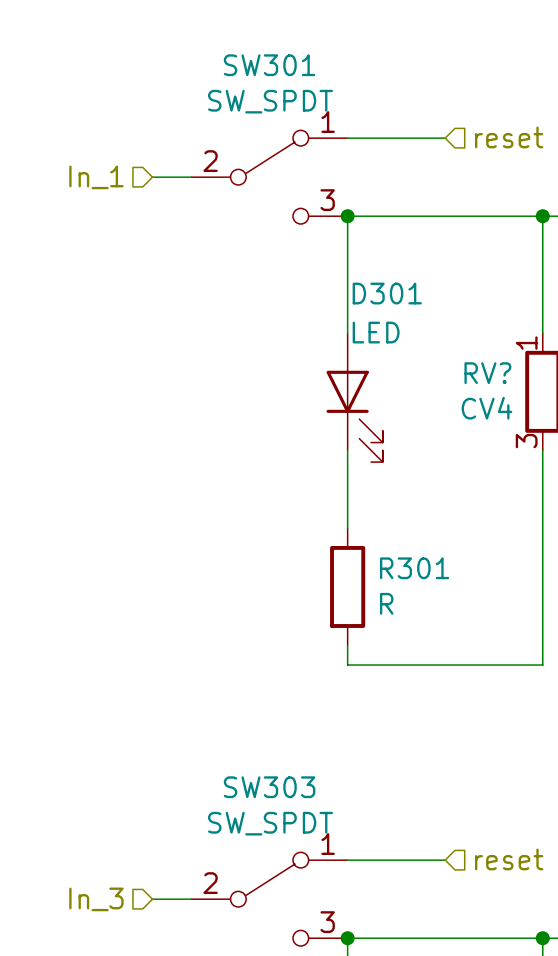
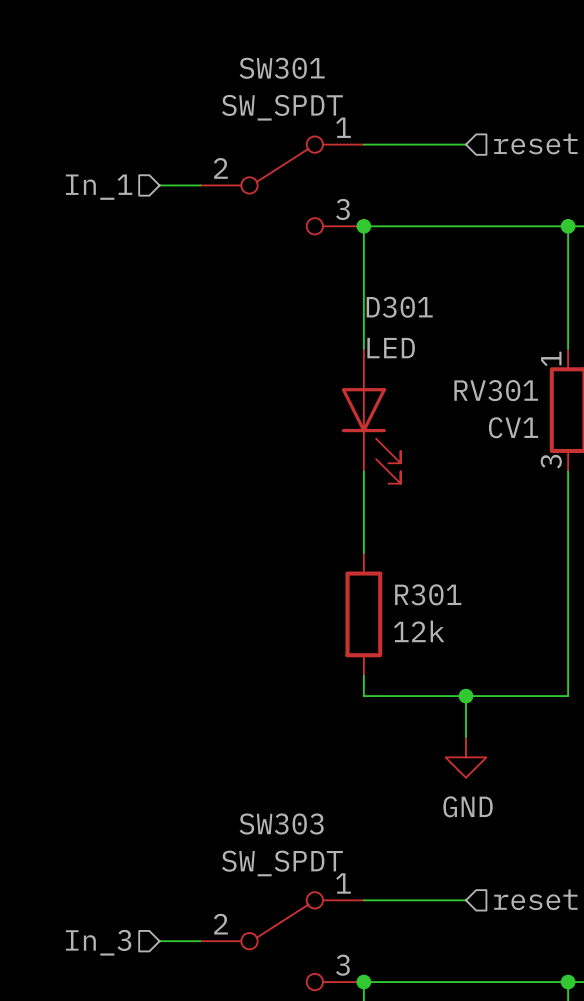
RV? name: RV? (487, 373) -> RV301 (496, 390)
RV? value: CV4 (486, 408) -> CV1 (513, 427)
R301 value: R (386, 603) -> 12k (419, 631)
wire: none -> (465, 696) (465, 736)
junction: none -> (465, 696)
power symbol: none -> GND (465, 757)

